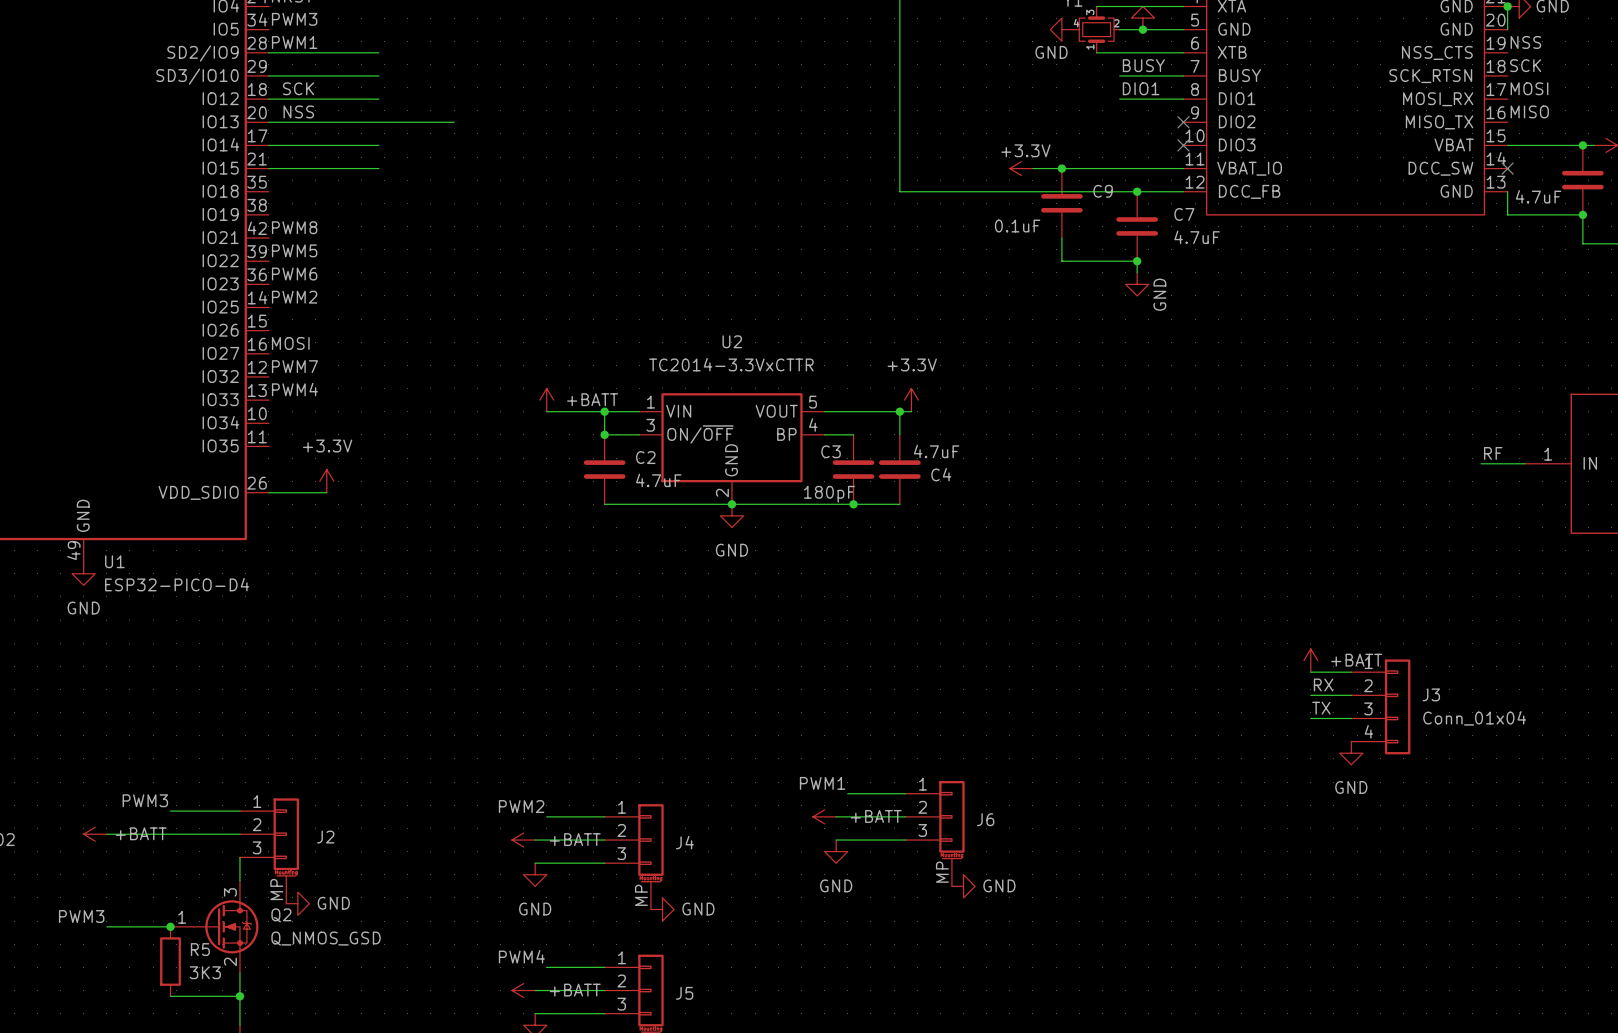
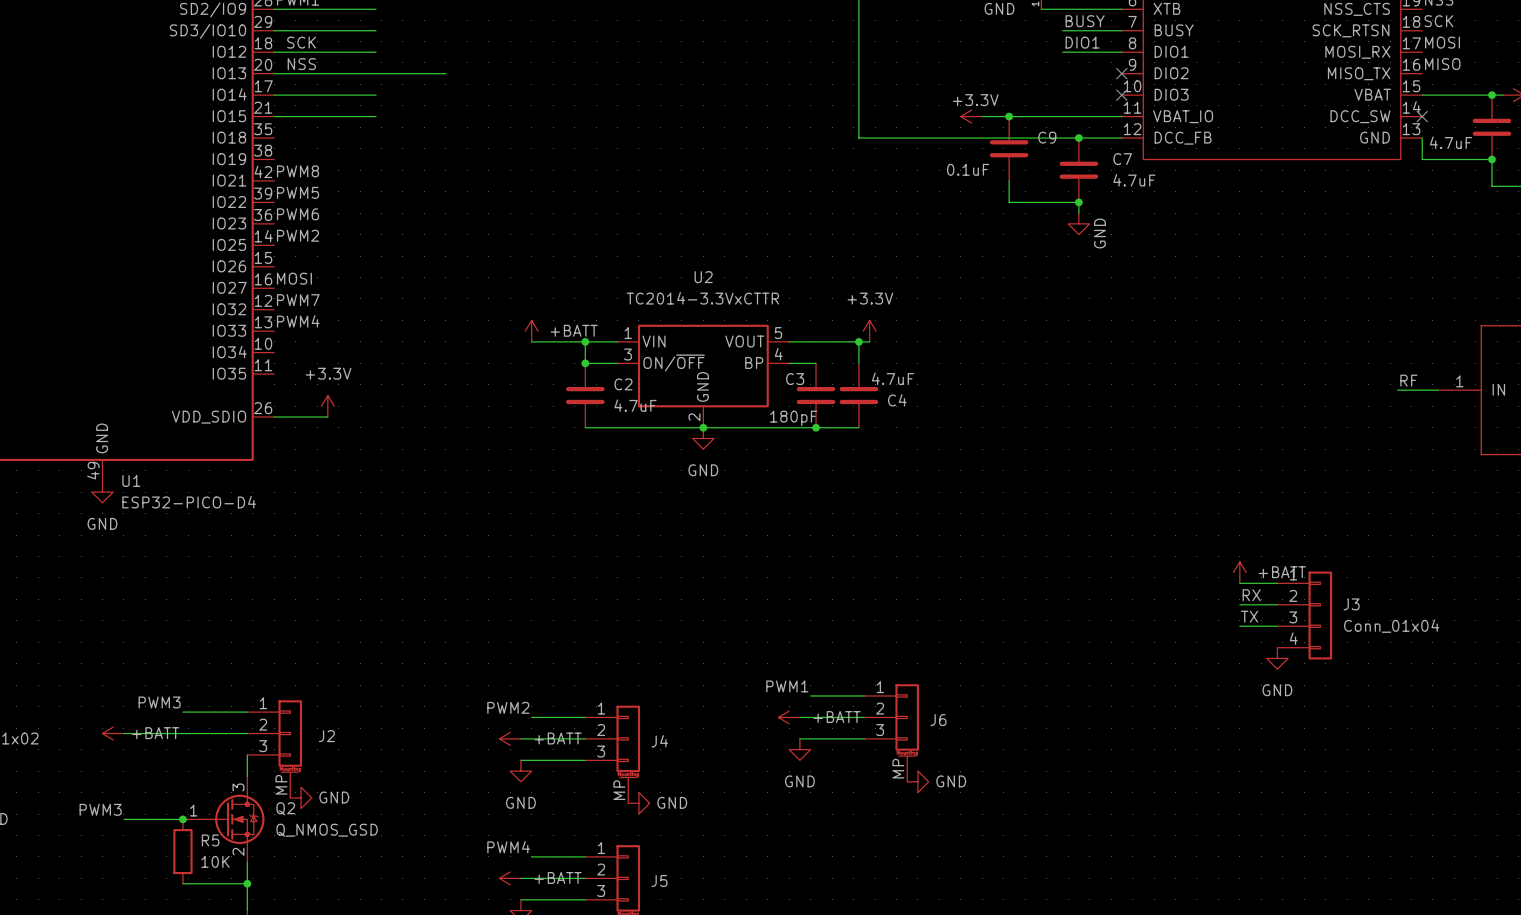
R5 value: 3K3 (205, 972) -> 10K (215, 861)

